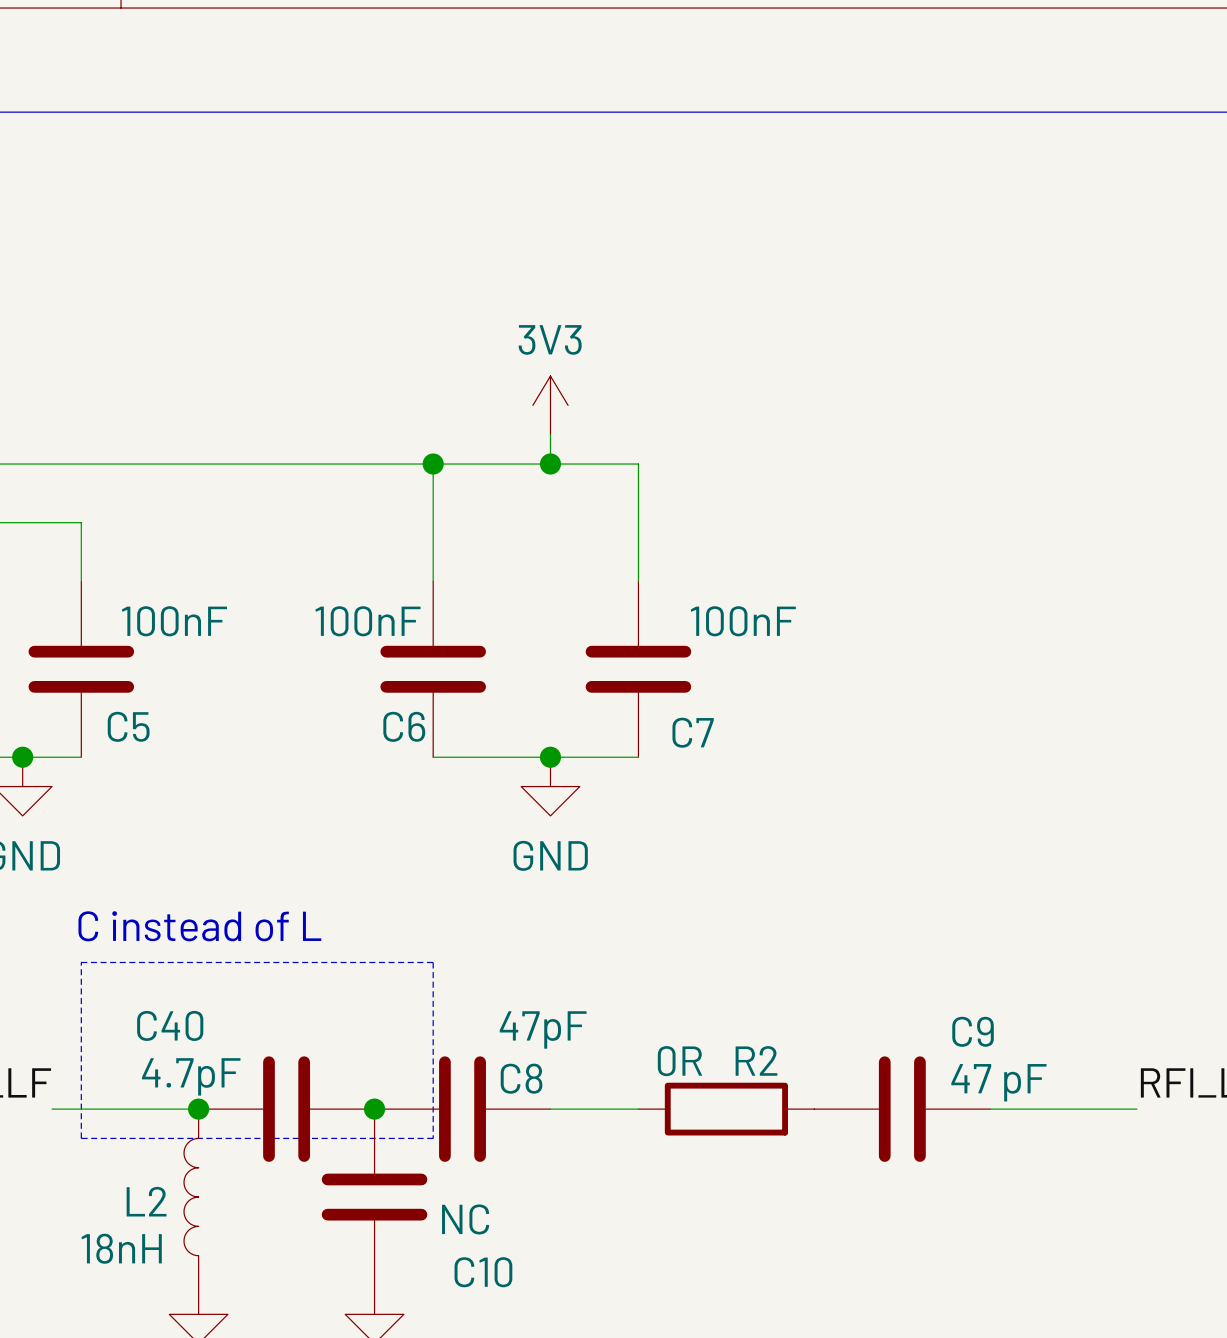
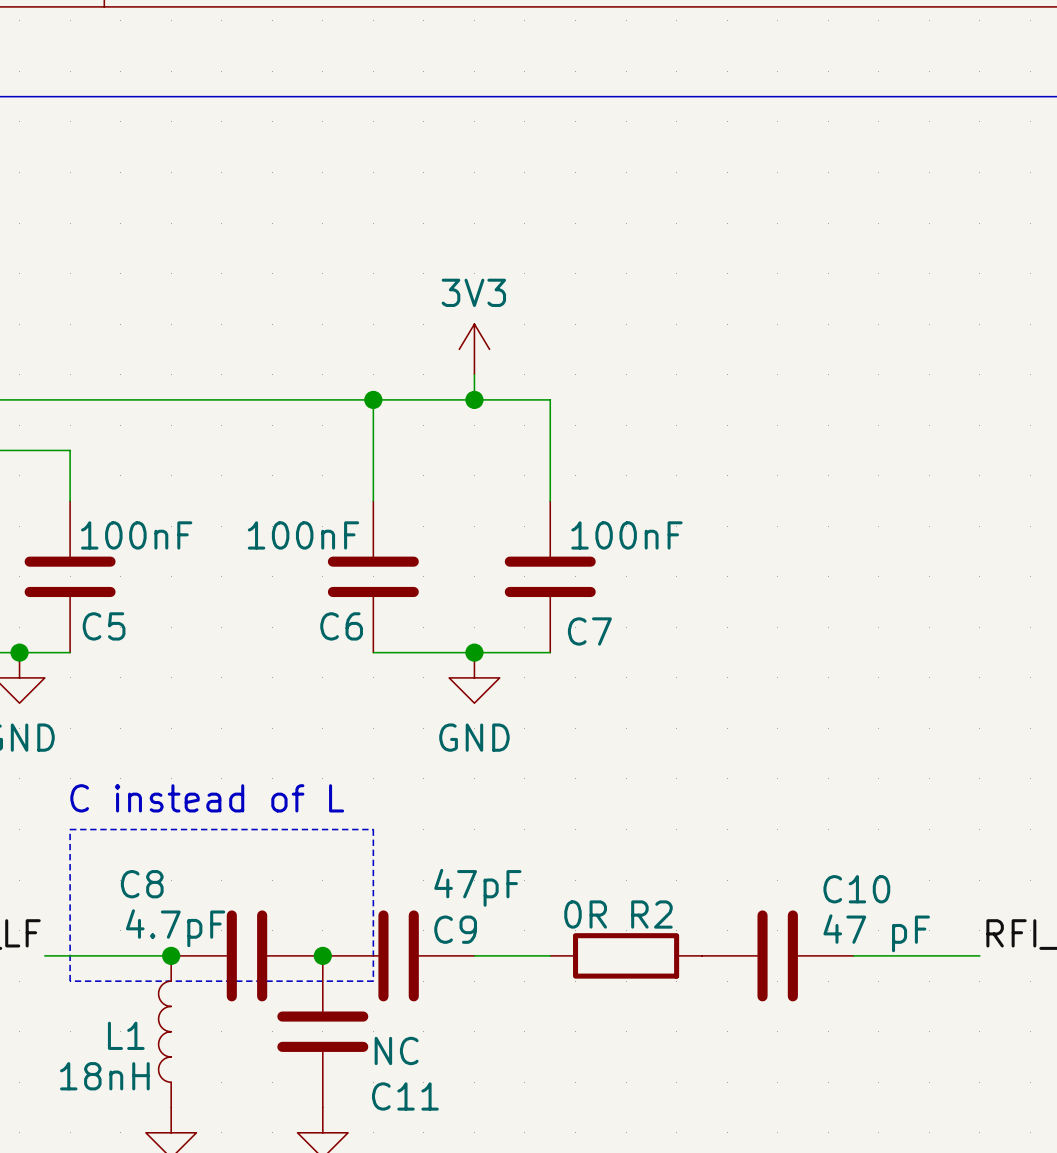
C40 name: C40 (170, 1025) -> C8 (142, 884)
C9 name: C9 (973, 1031) -> C10 (856, 889)
C8 name: C8 (521, 1078) -> C9 (455, 929)
L2 name: L2 (146, 1201) -> L1 (126, 1035)
C10 name: C10 (483, 1272) -> C11 (405, 1096)

